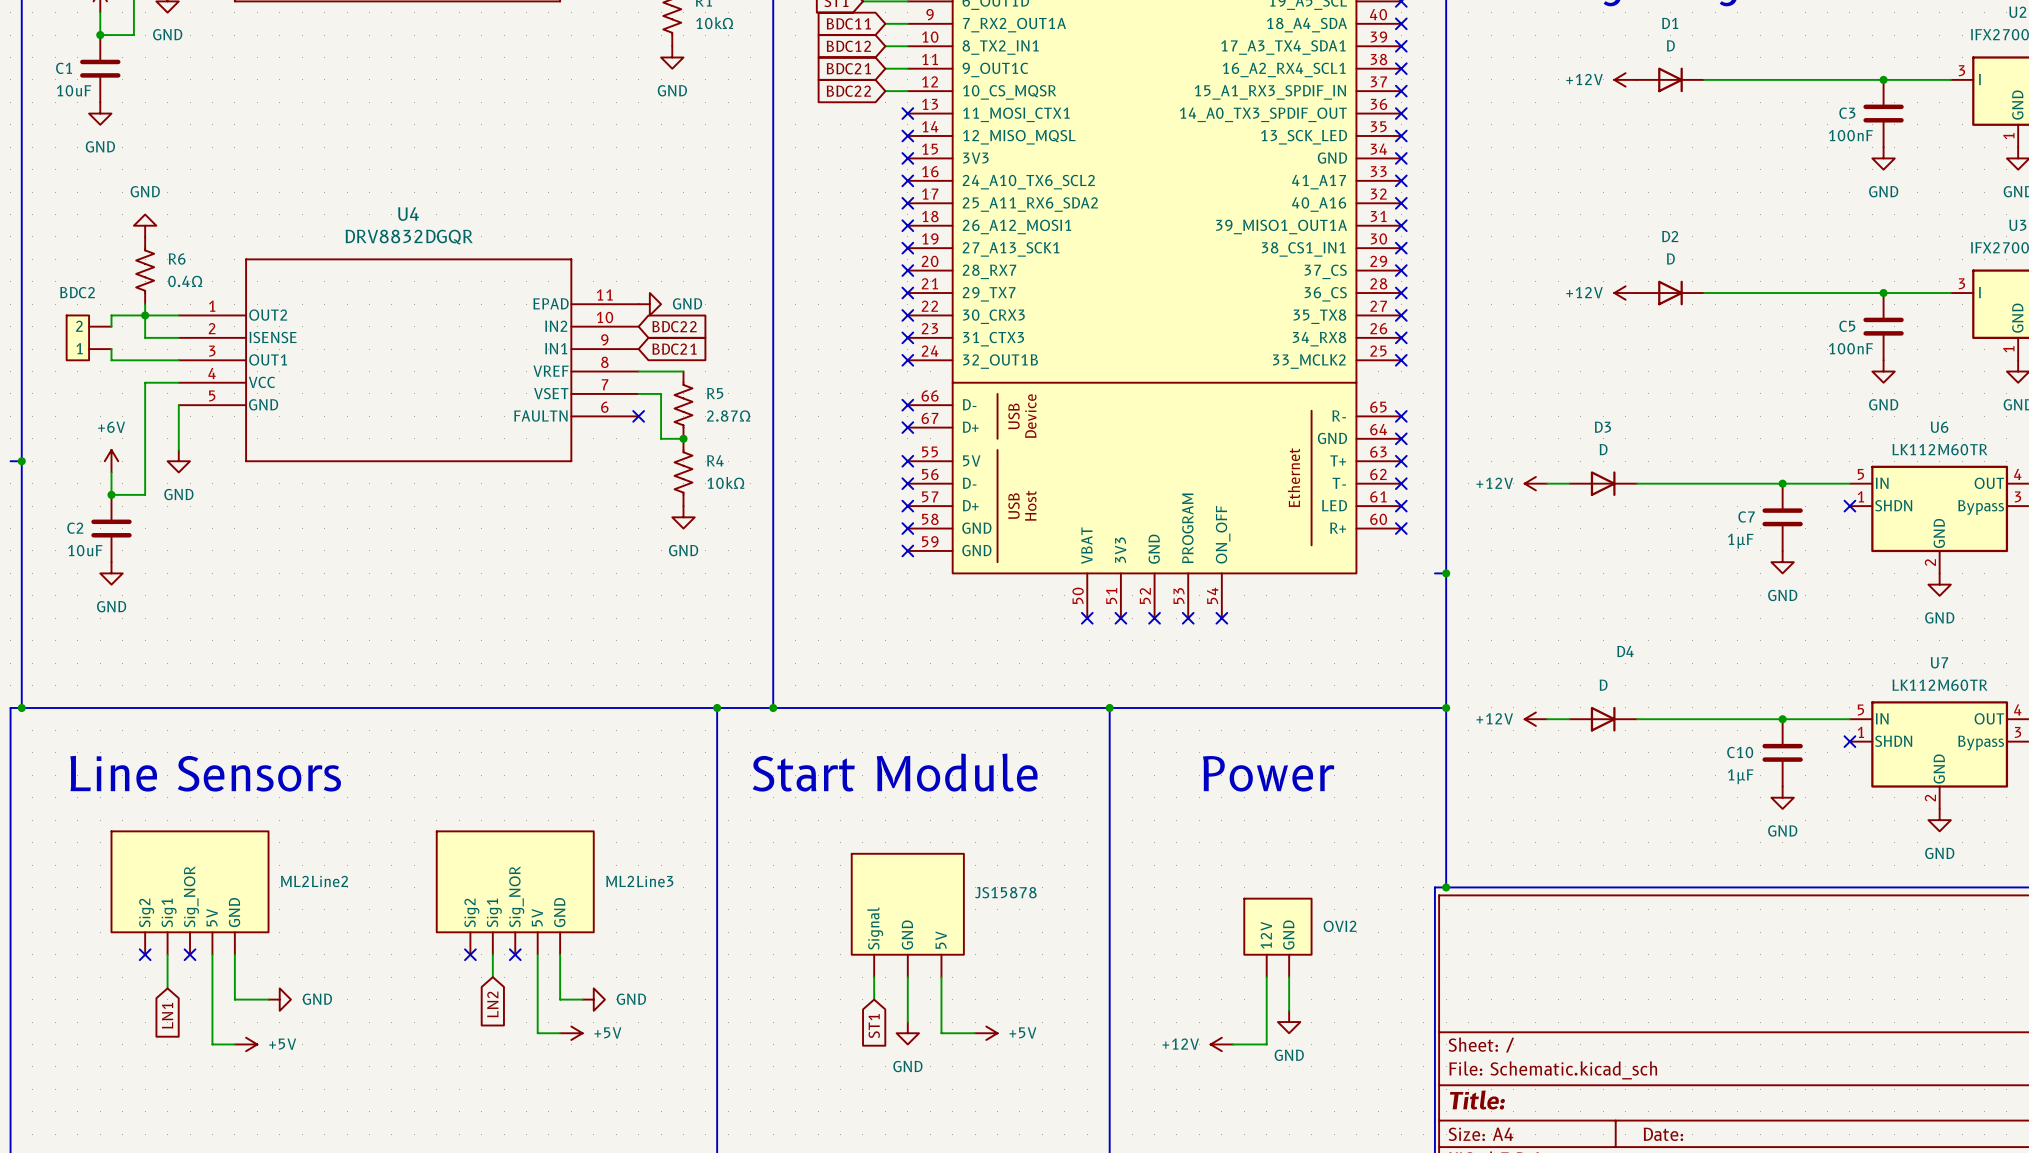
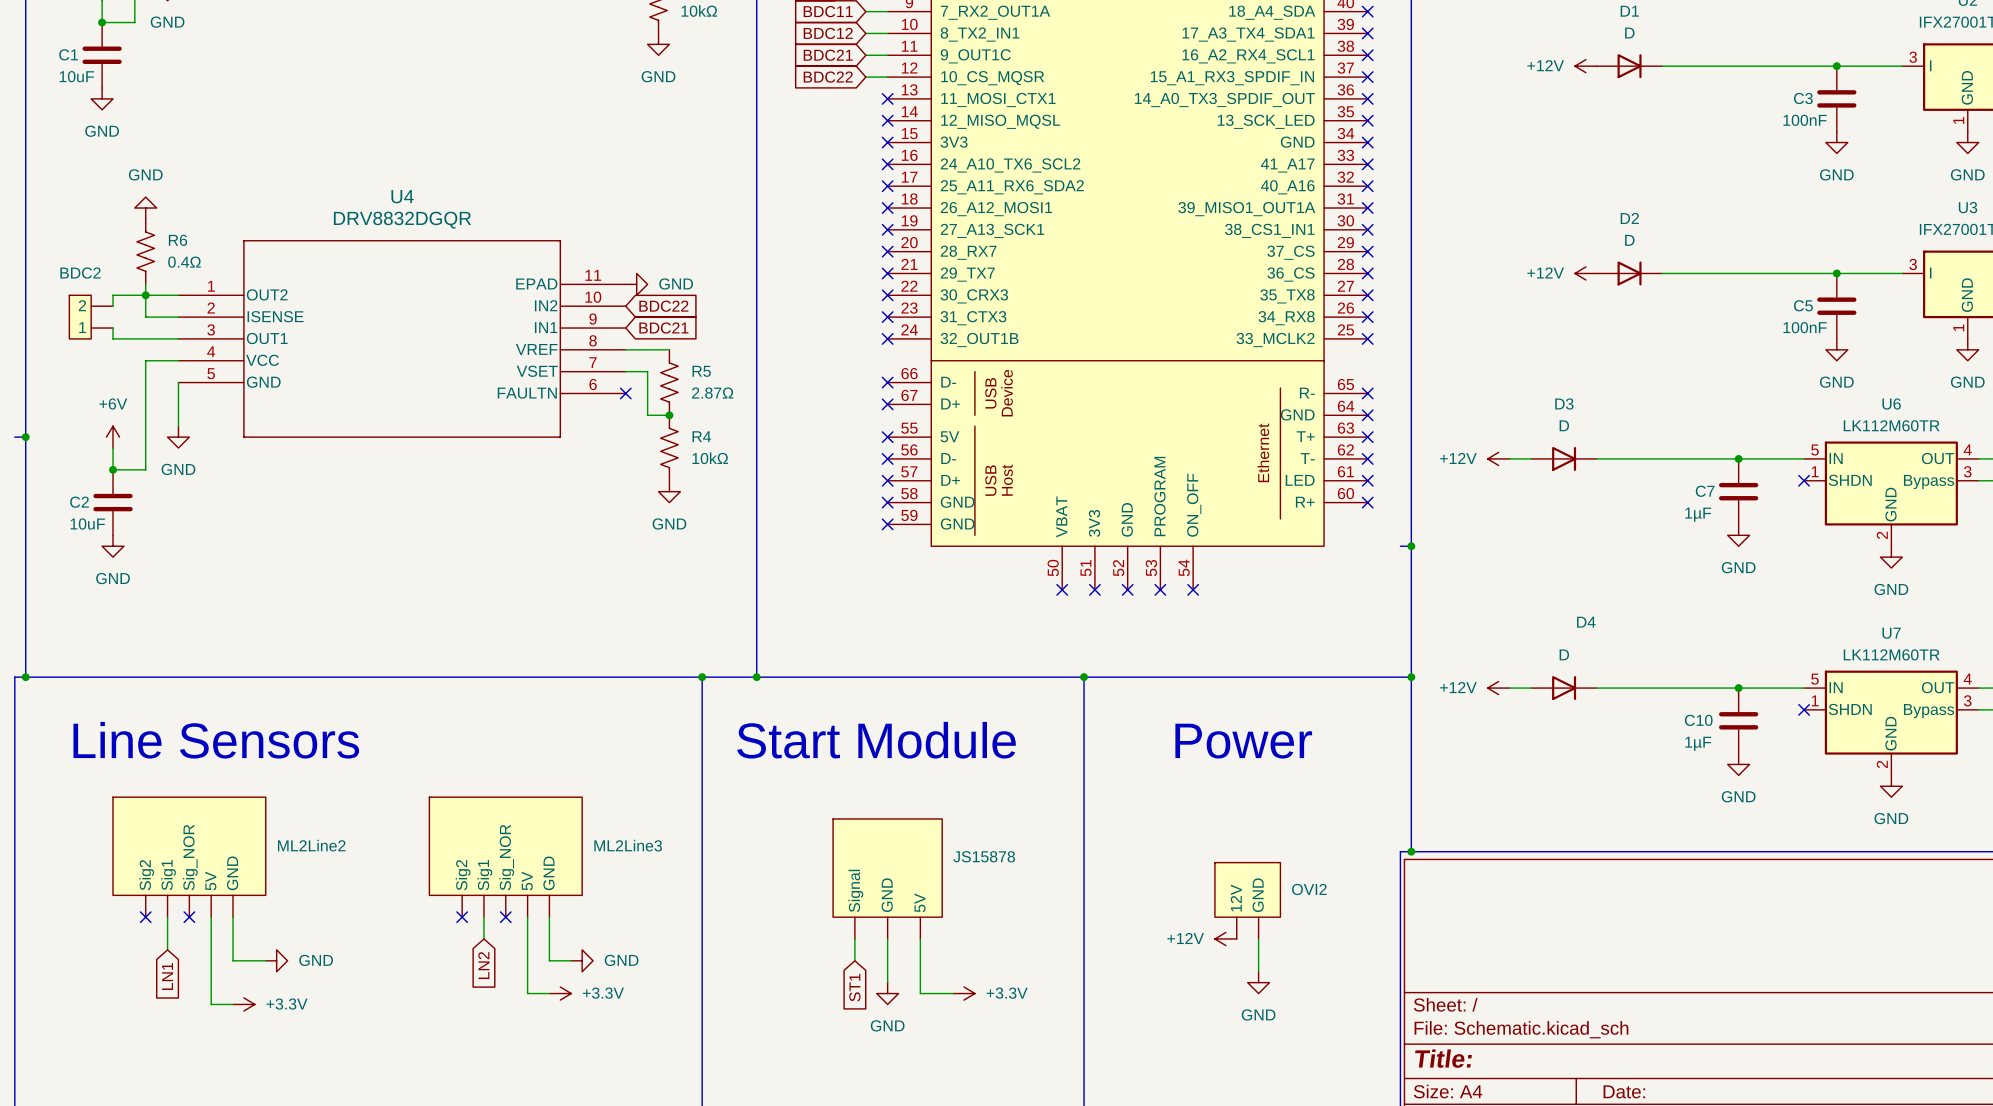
wire: (1266, 977) (1266, 1044) (1233, 1044) -> none
power symbol: +5V (571, 1033) -> +3.3V (560, 993)
power symbol: +5V (986, 1033) -> +3.3V (964, 993)
power symbol: +5V (246, 1044) -> +3.3V (243, 1004)
power symbol position: +12V (1221, 1044) -> +12V (1225, 938)

